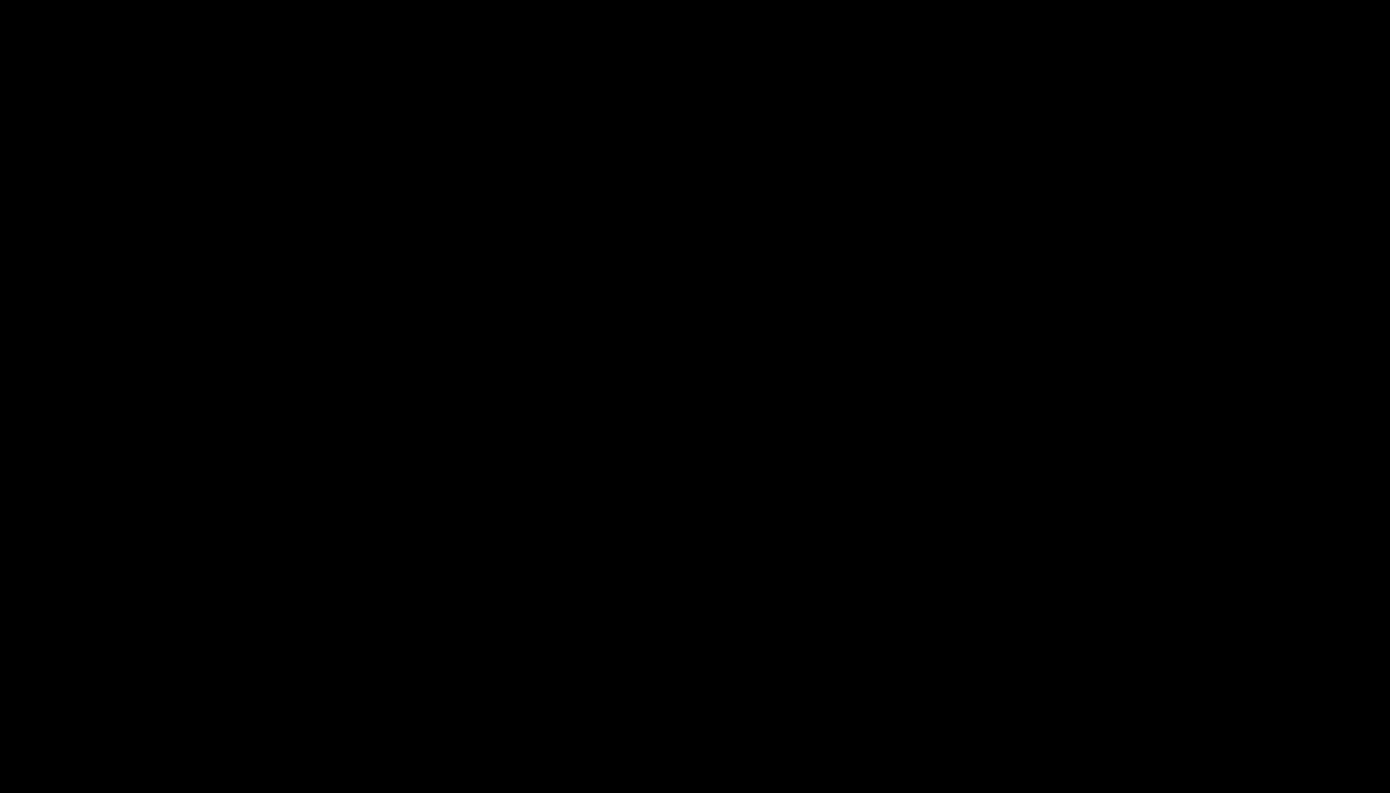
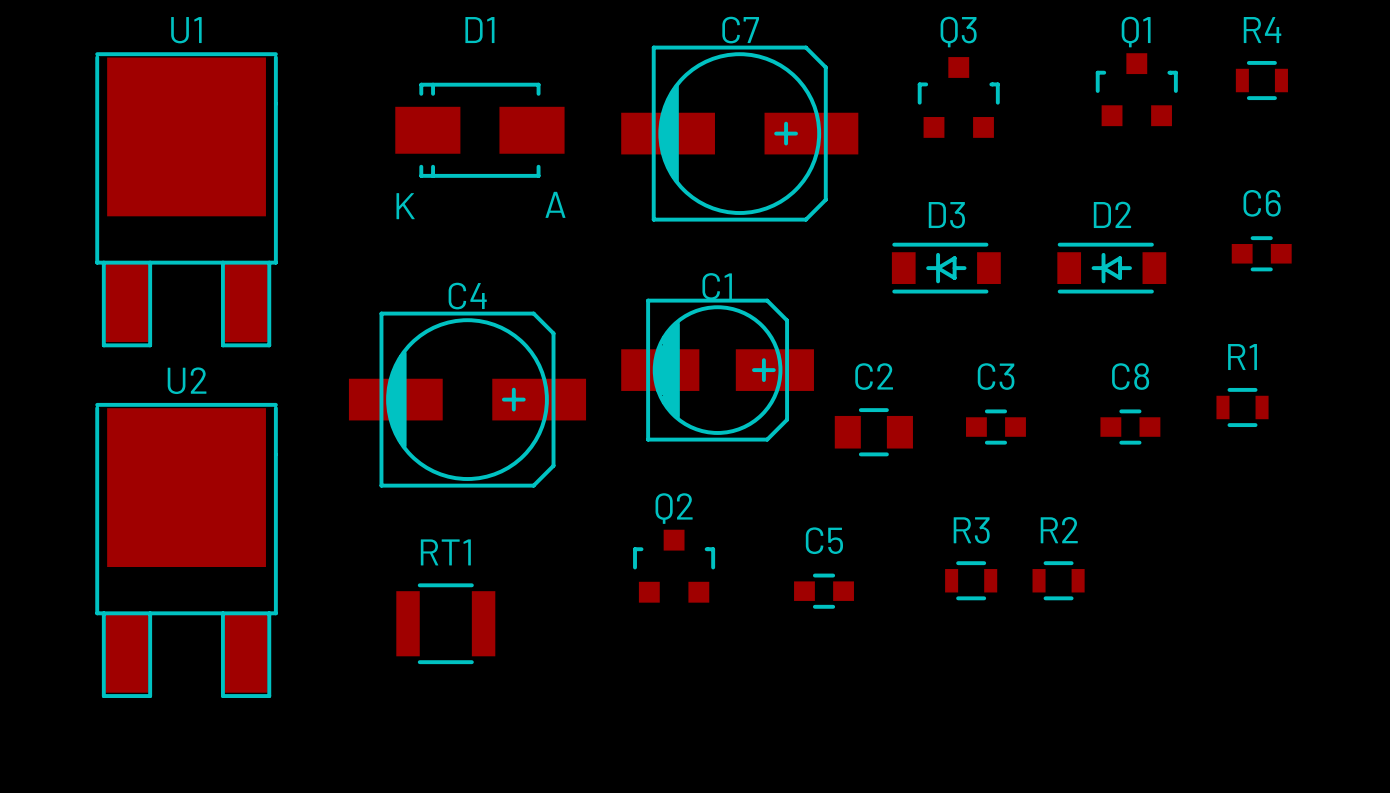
R4: none -> (1261, 80)
Q1: none -> (1136, 89)
Q3: none -> (958, 97)
D1: none -> (479, 130)
C7: none -> (739, 133)
U1: none -> (186, 199)
C6: none -> (1261, 253)
D3: none -> (946, 268)
D2: none -> (1111, 268)
C1: none -> (717, 370)
C4: none -> (467, 399)
R1: none -> (1242, 407)
C3: none -> (995, 427)
C8: none -> (1130, 427)
C2: none -> (873, 432)
U2: none -> (186, 550)
Q2: none -> (674, 566)
R3: none -> (971, 580)
R2: none -> (1058, 580)
C5: none -> (824, 591)
RT1: none -> (445, 623)

